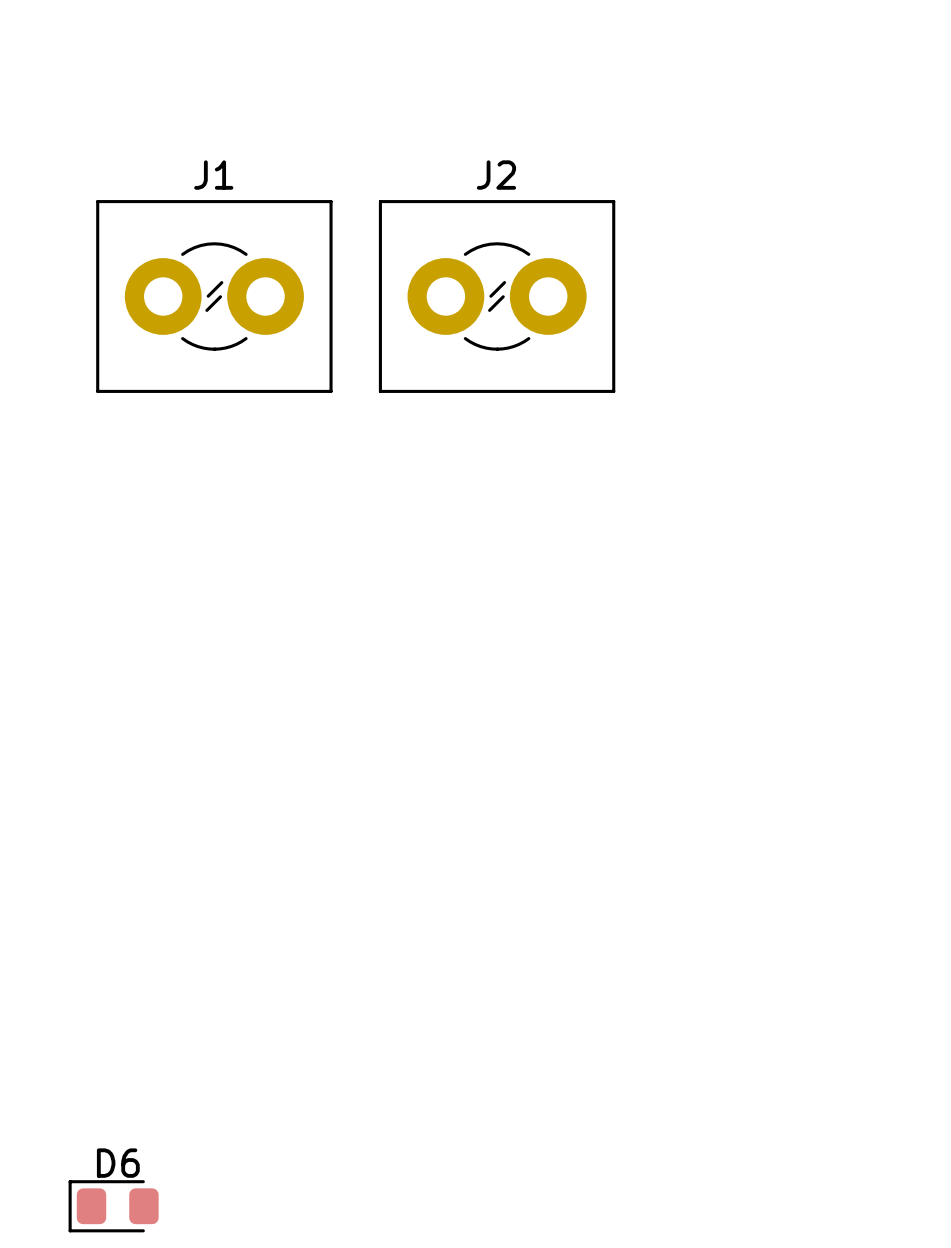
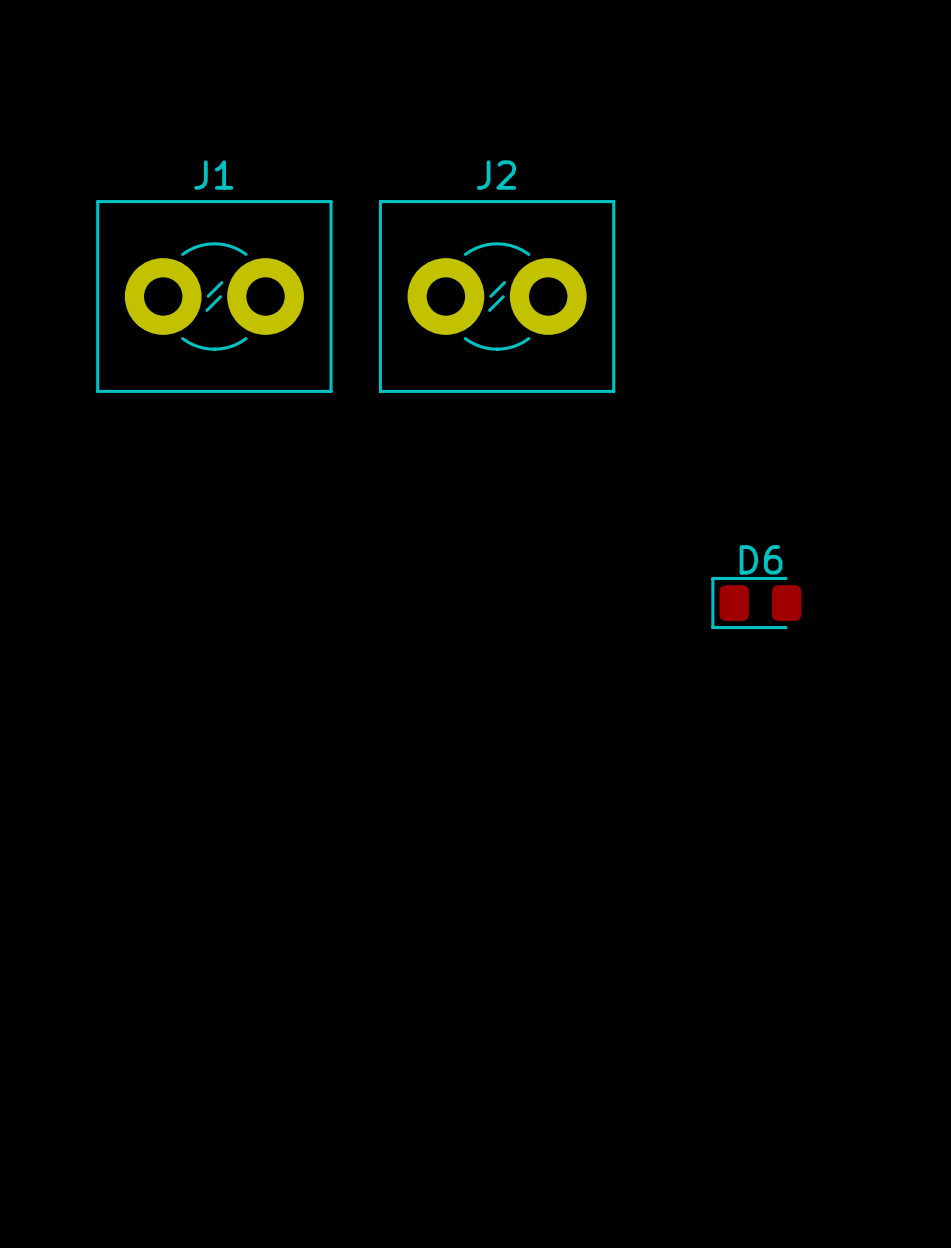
D6 position: (113, 1206) -> (756, 603)

